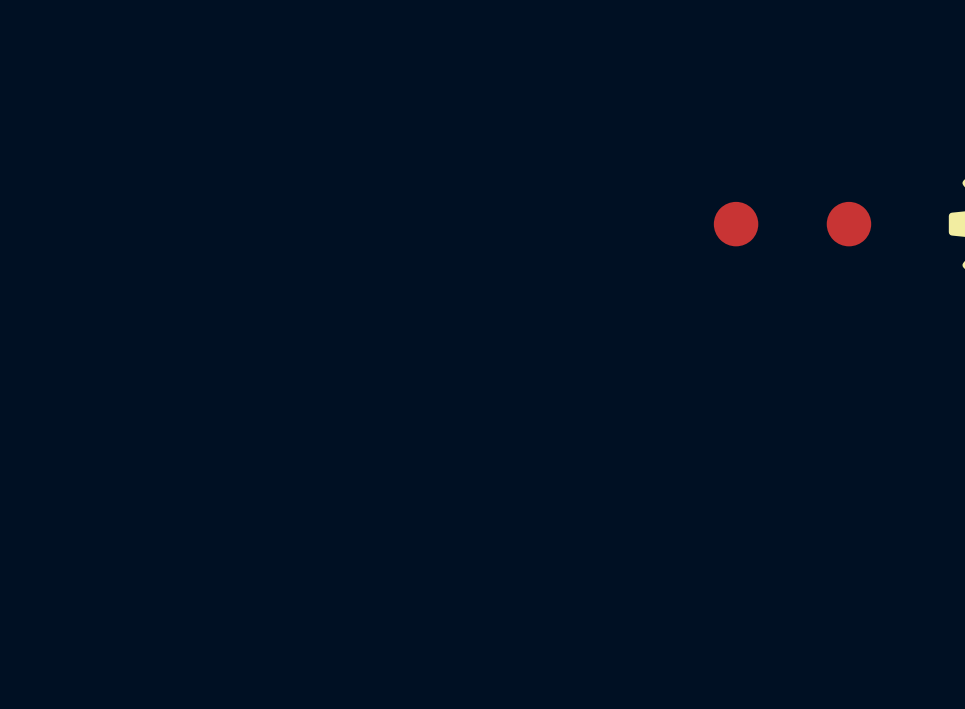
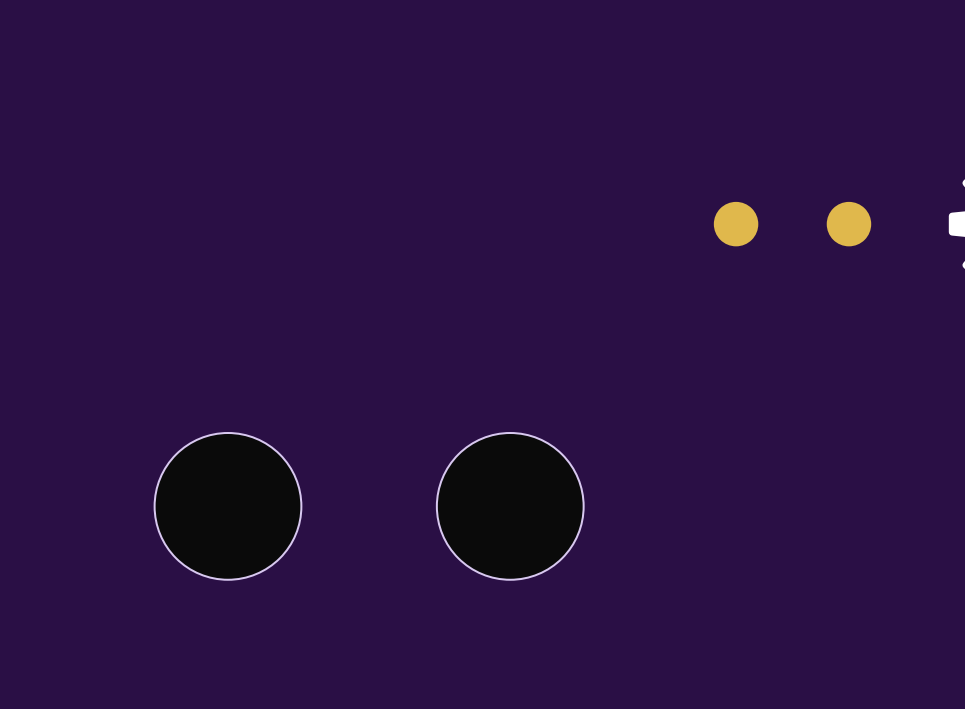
part: none -> (227, 506)
part: none -> (510, 506)

